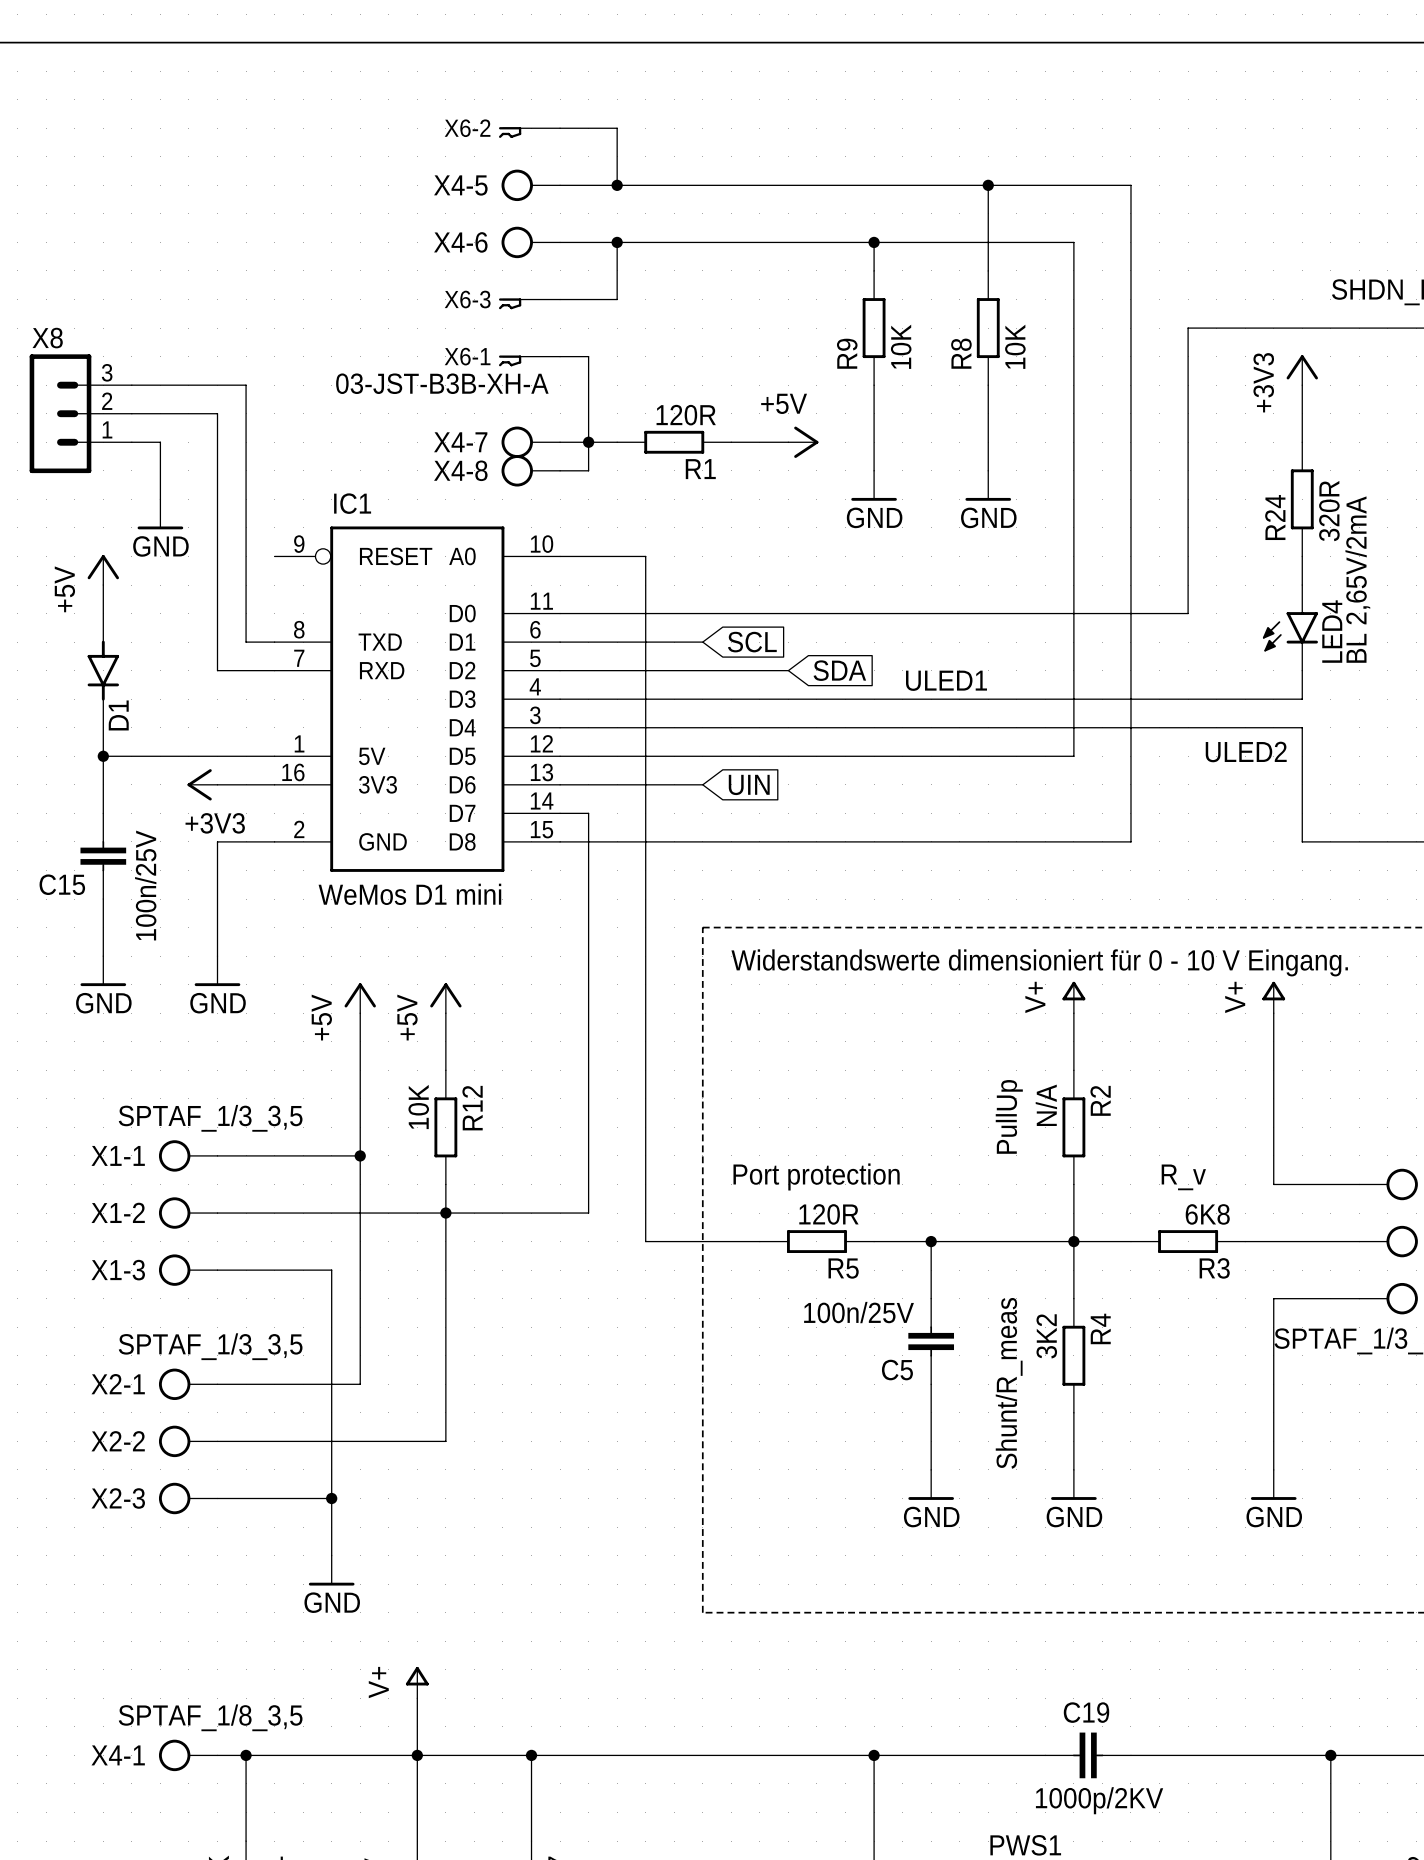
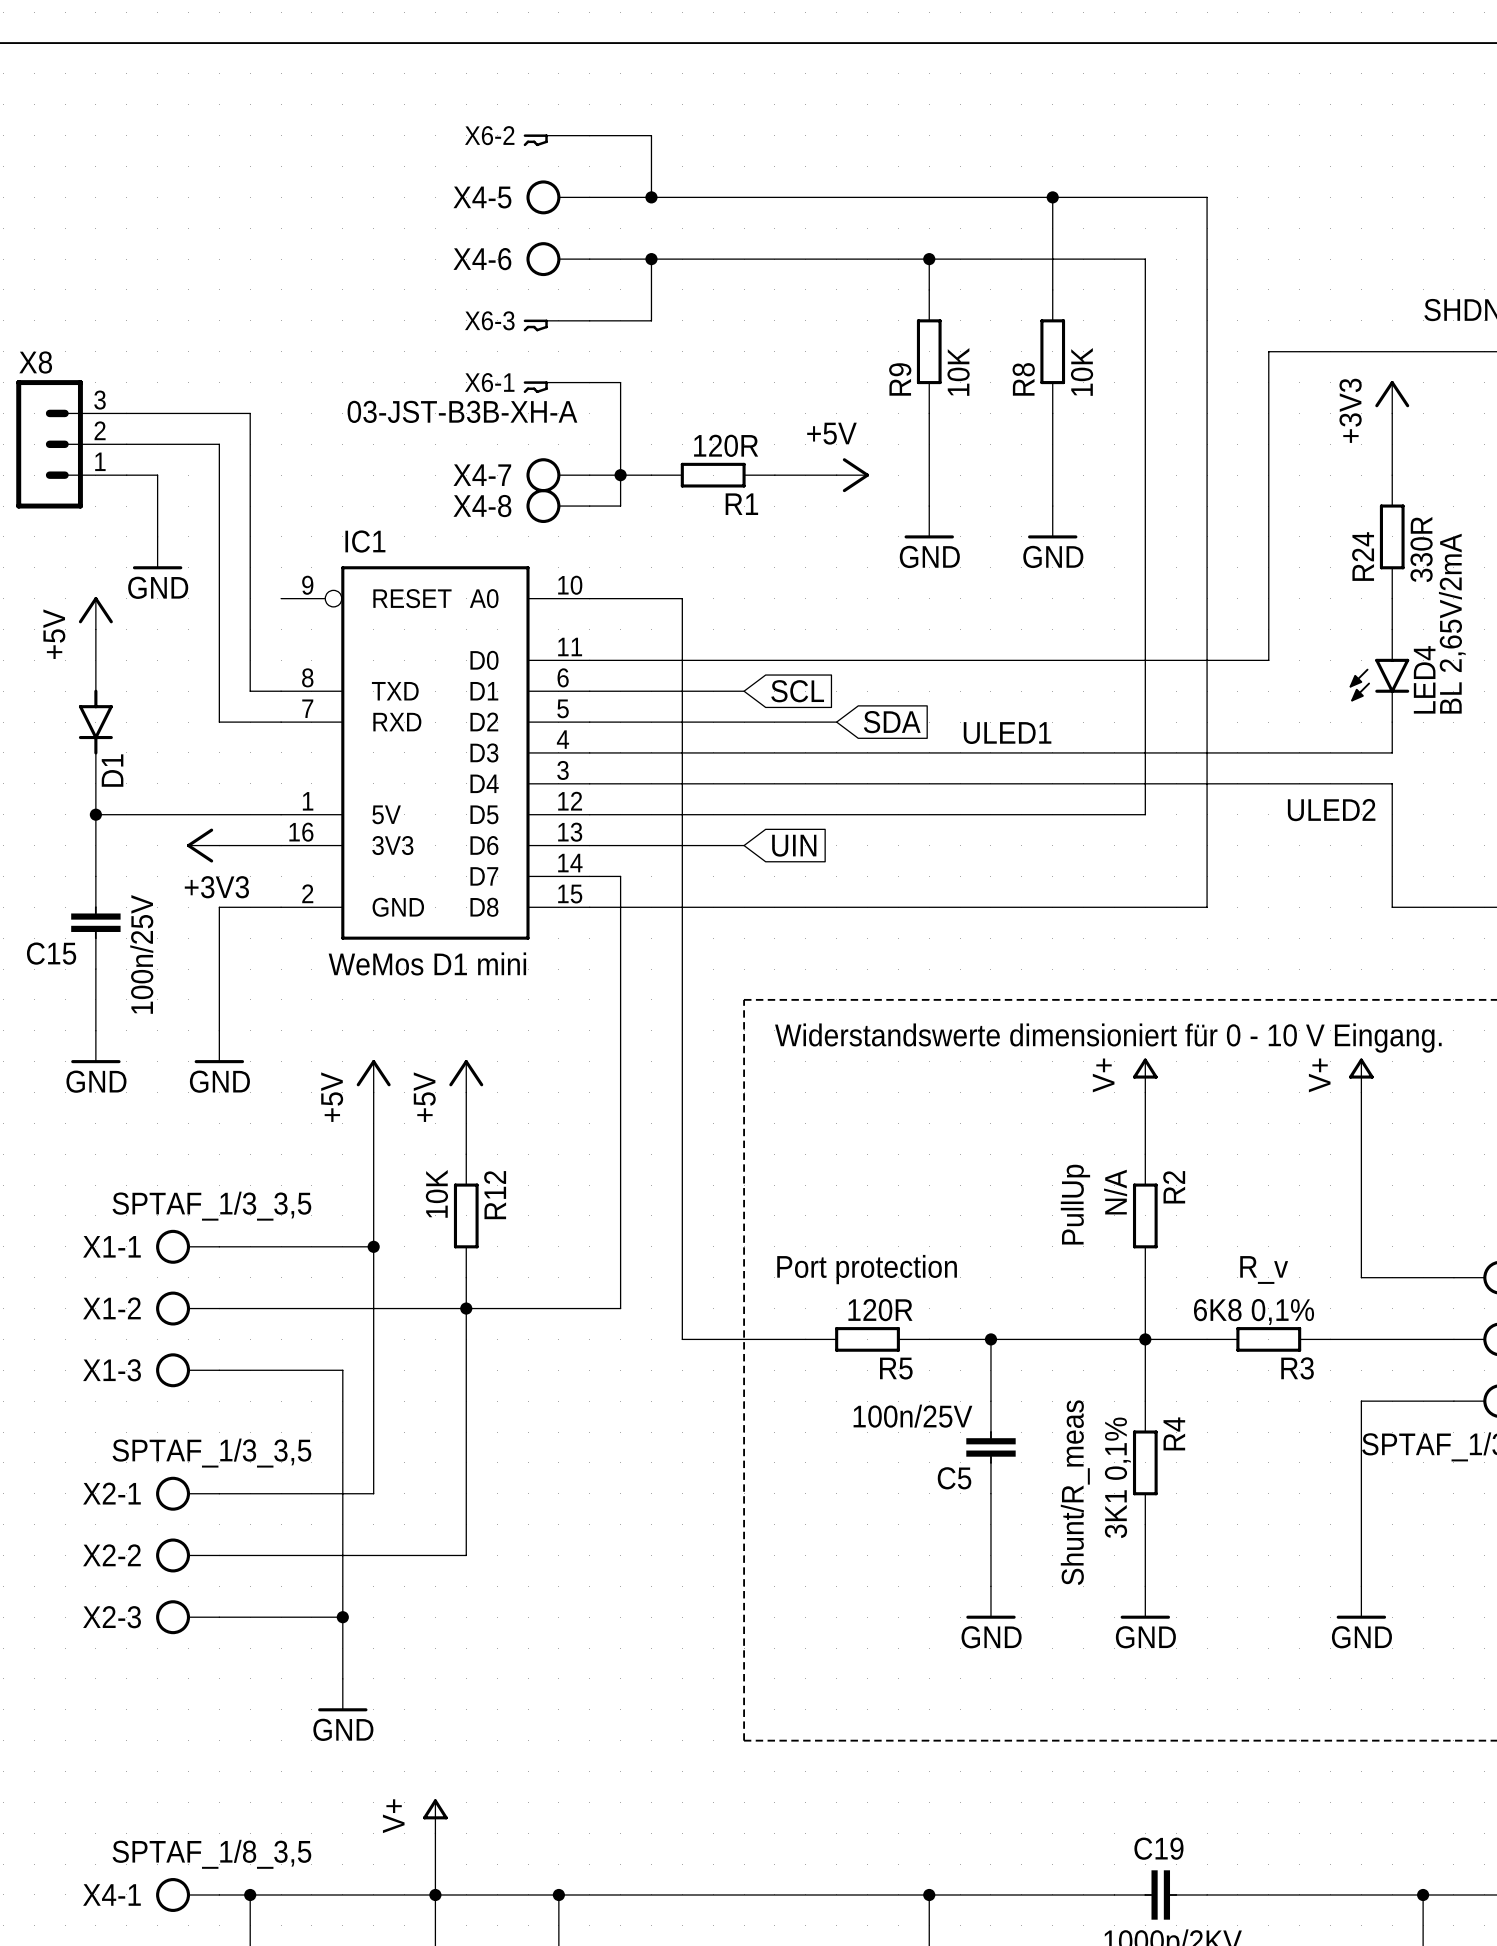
R24 value: 320R (1329, 511) -> 330R (1421, 549)
R3 value: 6K8 (1207, 1214) -> 6K8 0,1% (1254, 1311)
R4 value: 3K2 (1046, 1336) -> 3K1 0,1% (1117, 1477)

